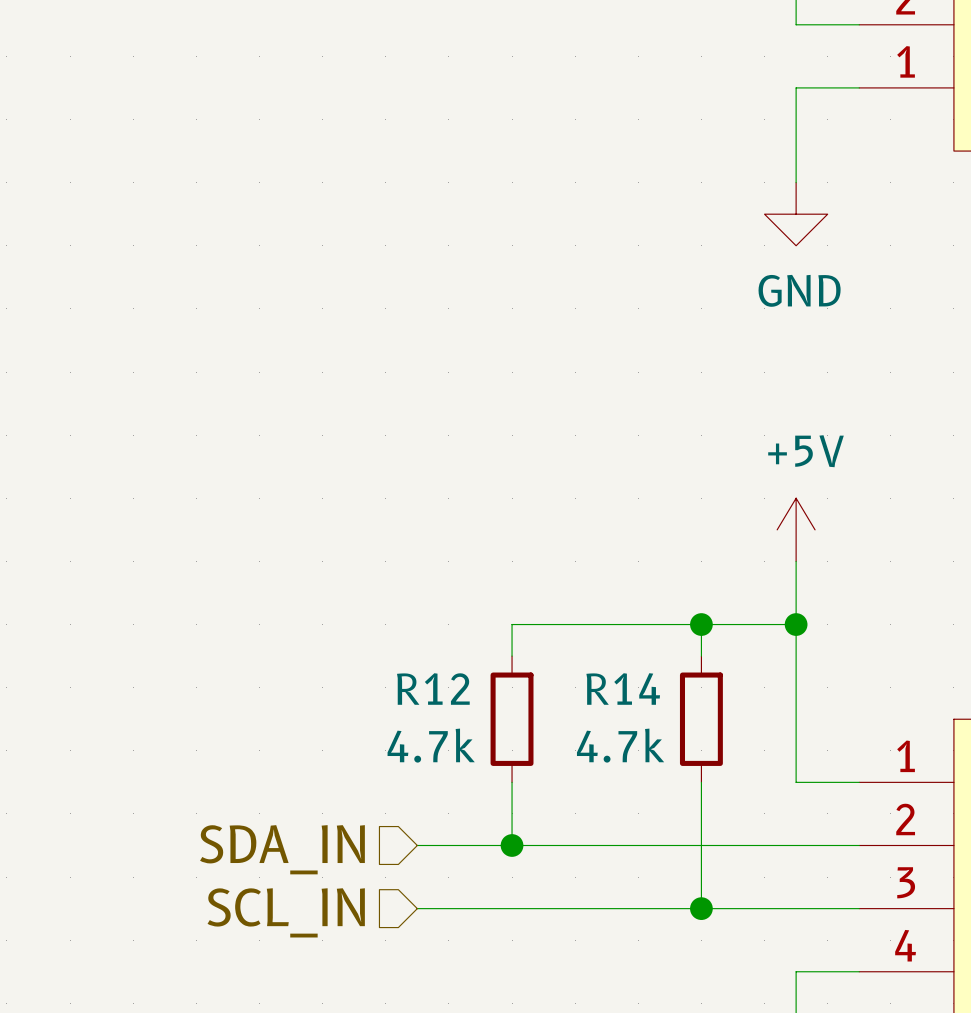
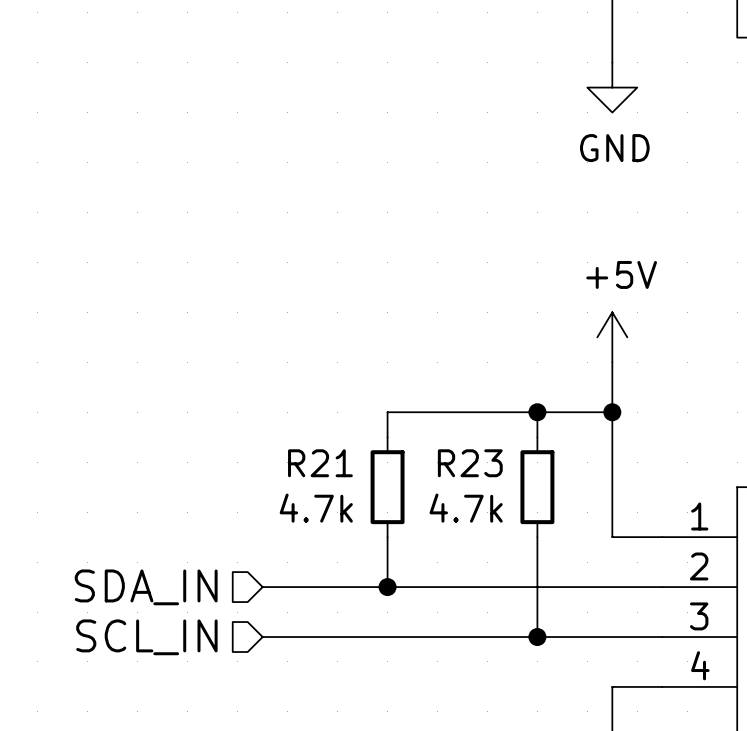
R12 name: R12 (433, 689) -> R21 (320, 463)
R14 name: R14 (623, 689) -> R23 (470, 463)
wire: none -> (262, 587) (312, 587)
hierarchical label position: SDA_IN (282, 849) -> SDA_IN (146, 587)
wire: none -> (262, 637) (312, 637)
hierarchical label position: SCL_IN (286, 912) -> SCL_IN (146, 637)

